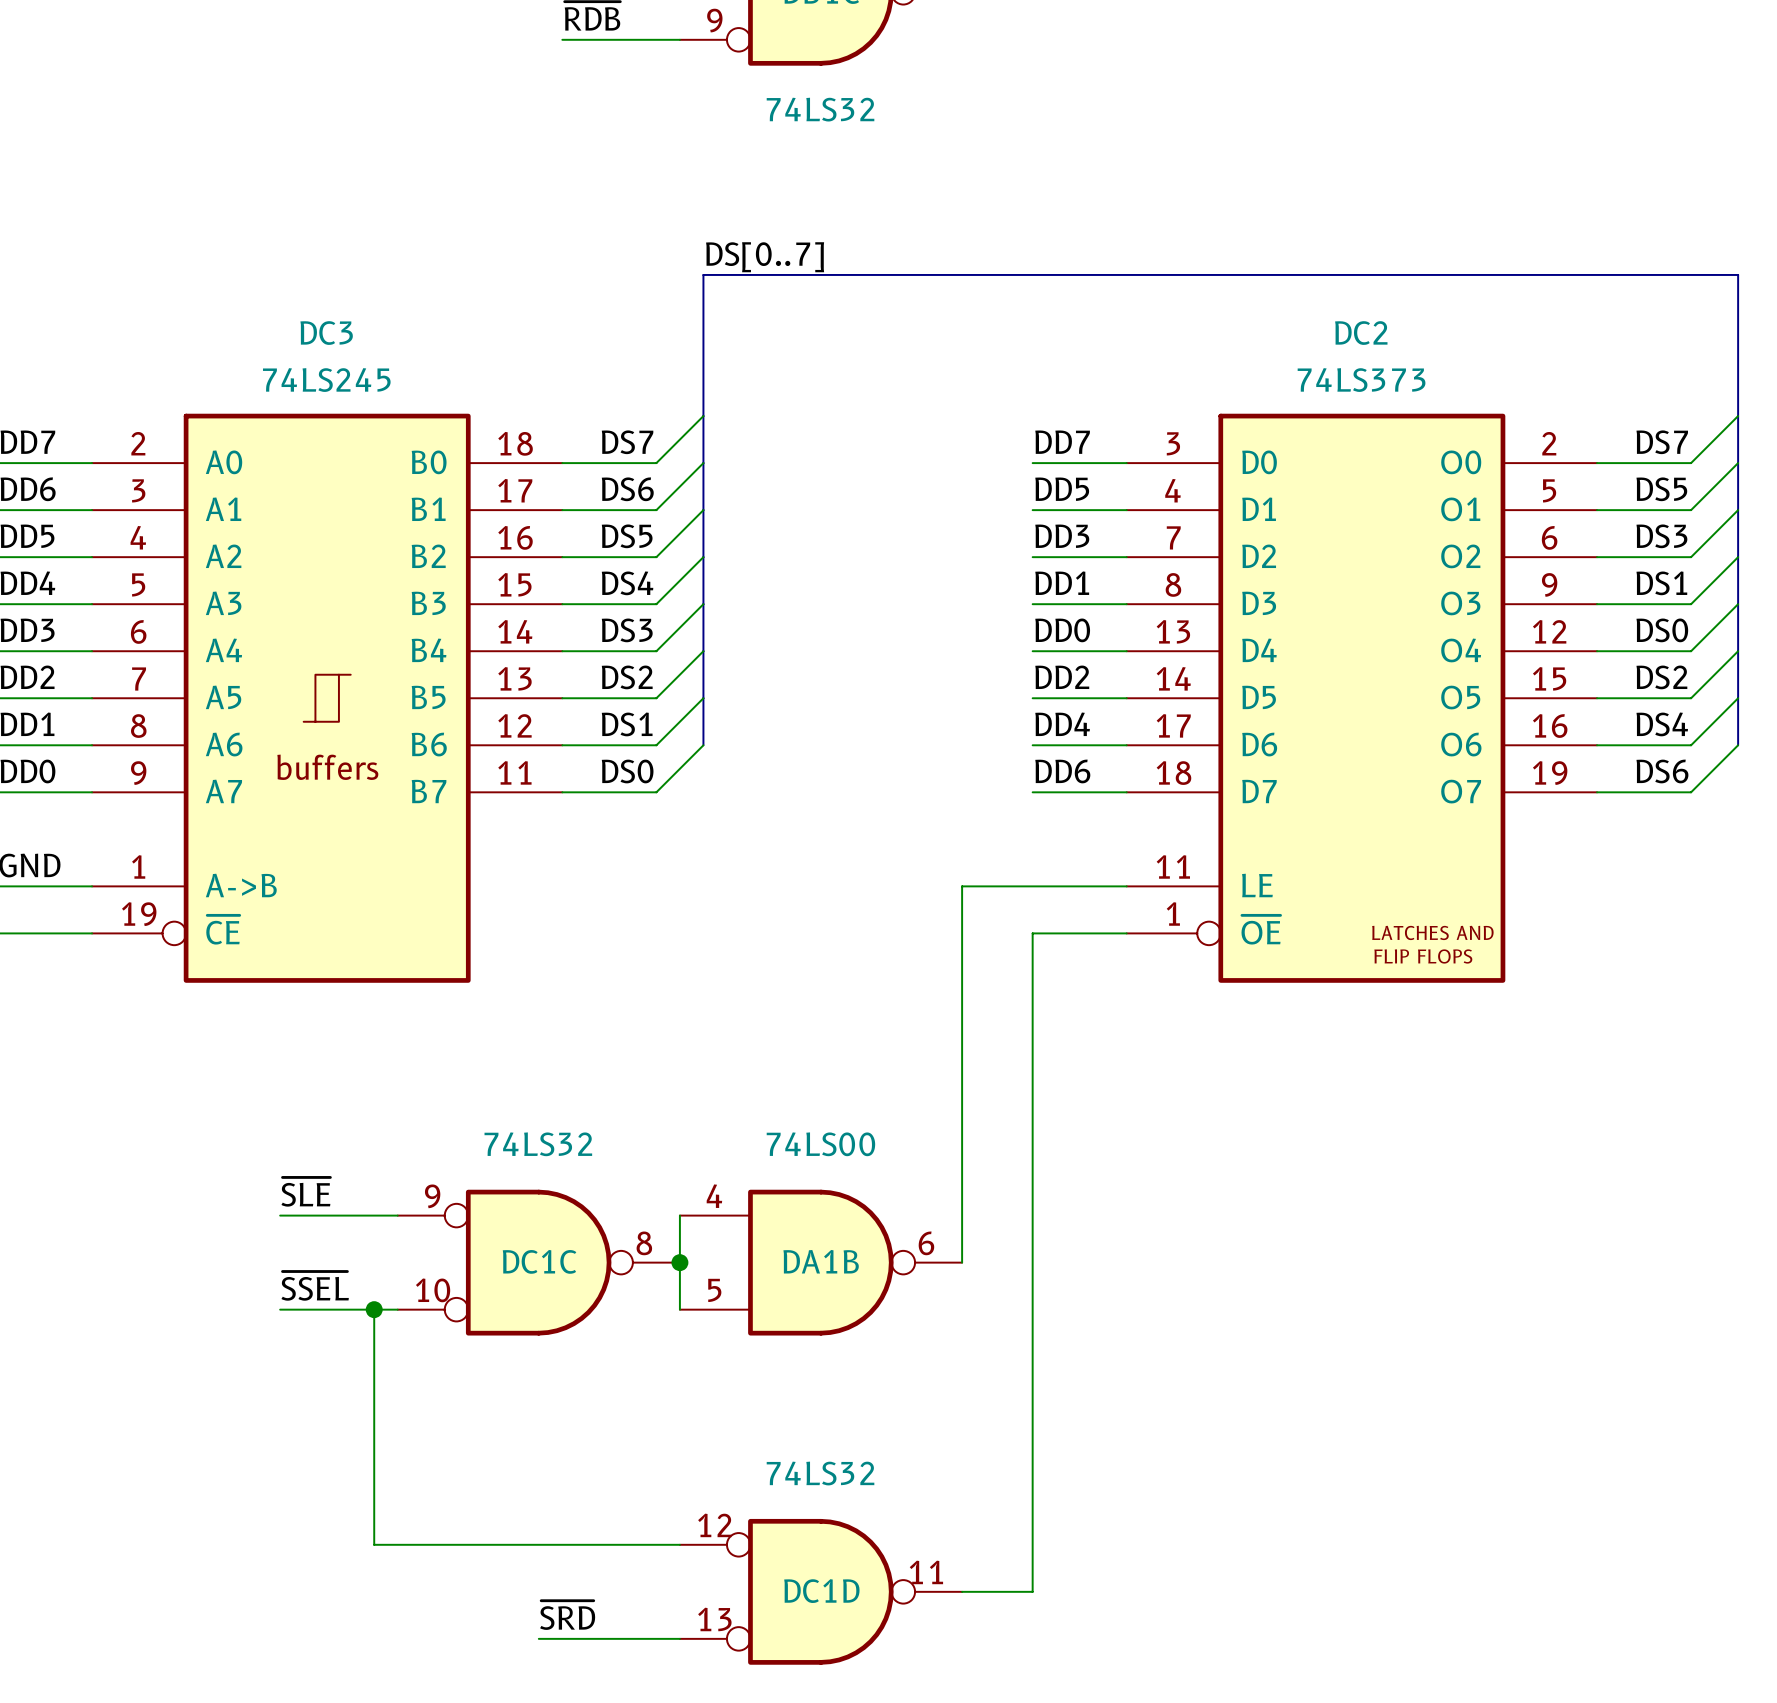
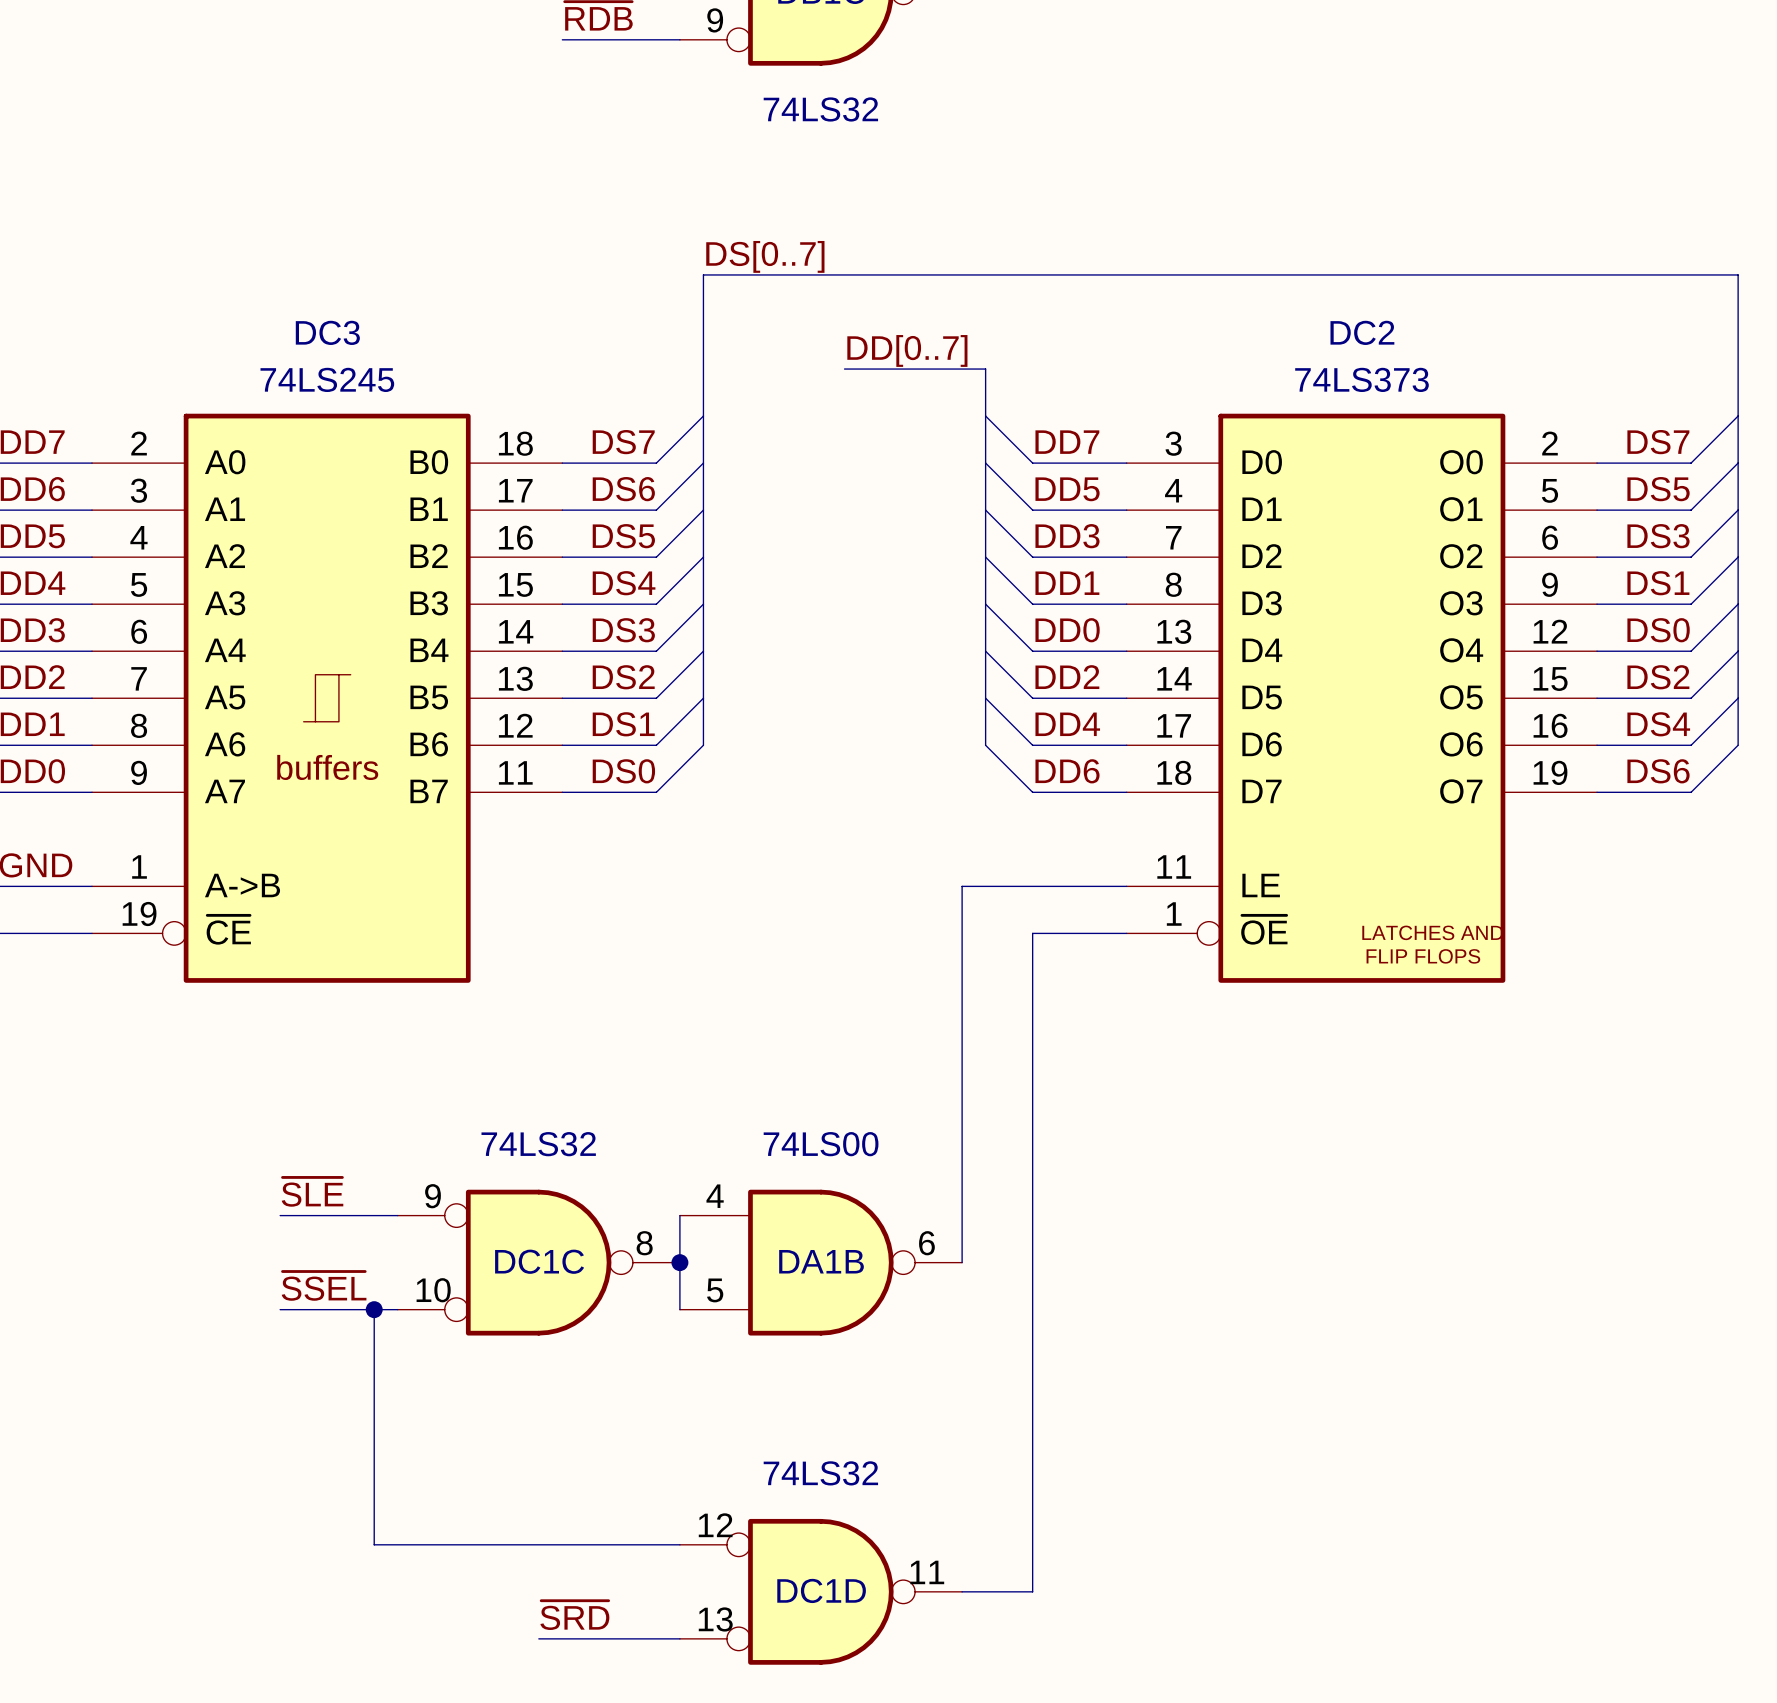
label: none -> DD[0..7] (907, 350)
bus: none -> (844, 369) (985, 369) (985, 745)
wire: none -> (985, 416) (1032, 463)
wire: none -> (985, 463) (1032, 510)
wire: none -> (985, 510) (1032, 557)
wire: none -> (985, 557) (1032, 604)
wire: none -> (985, 604) (1032, 651)
wire: none -> (985, 651) (1032, 698)
wire: none -> (985, 698) (1032, 745)
wire: none -> (985, 745) (1032, 792)

